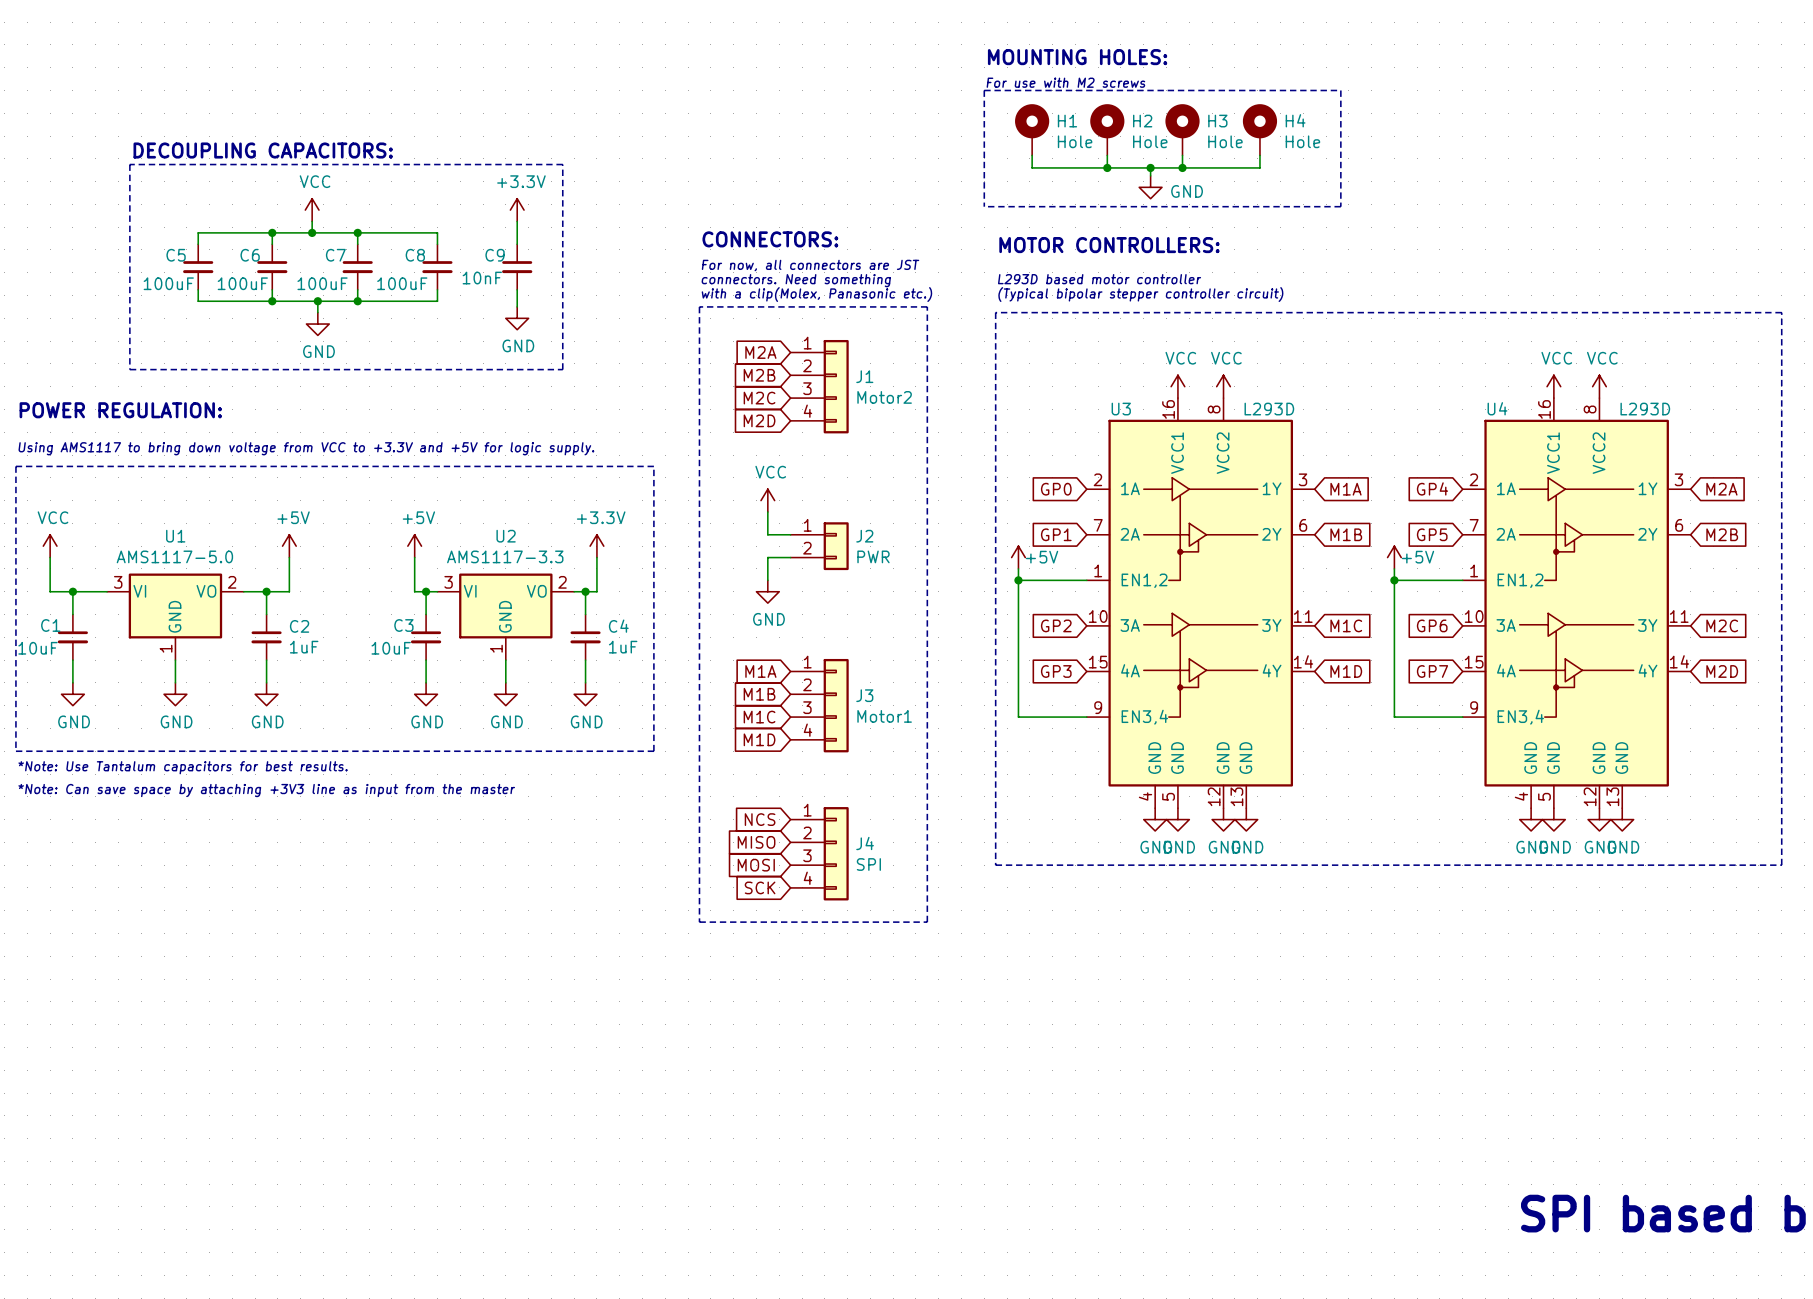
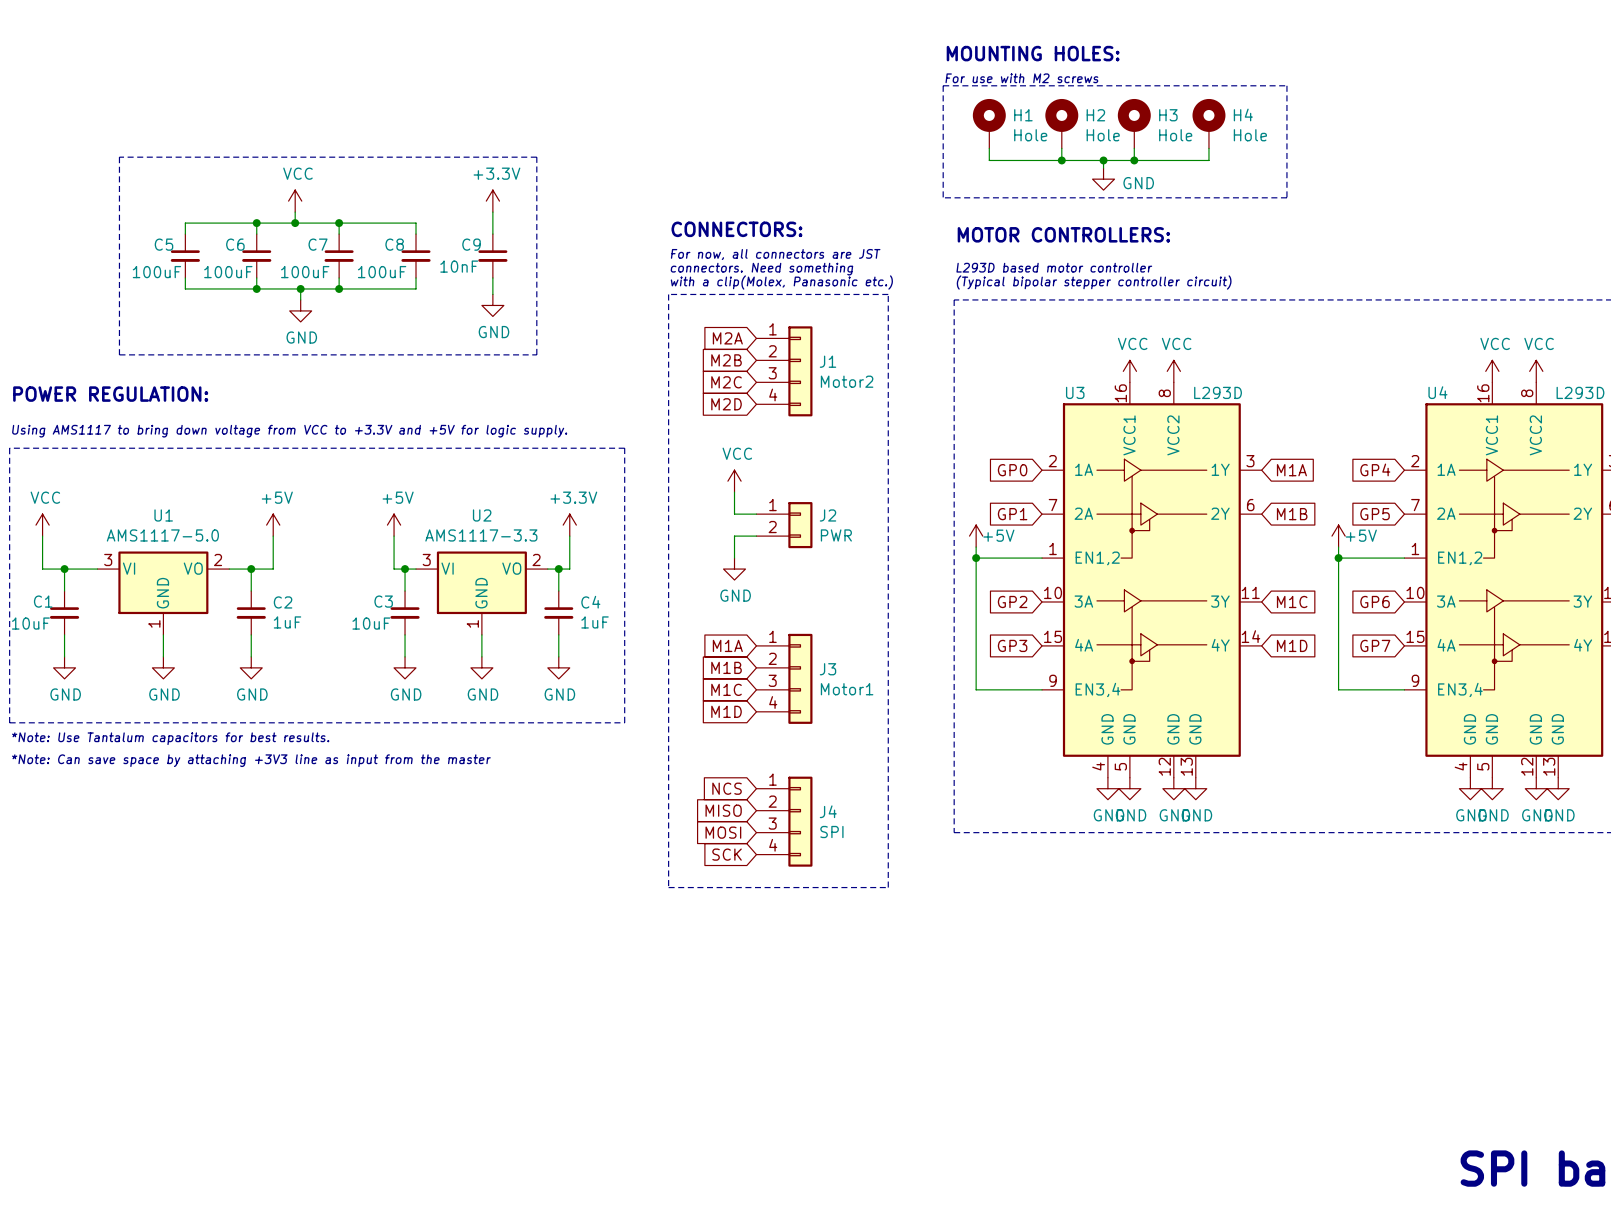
text: DECOUPLING CAPACITORS: (263, 150) -> none

